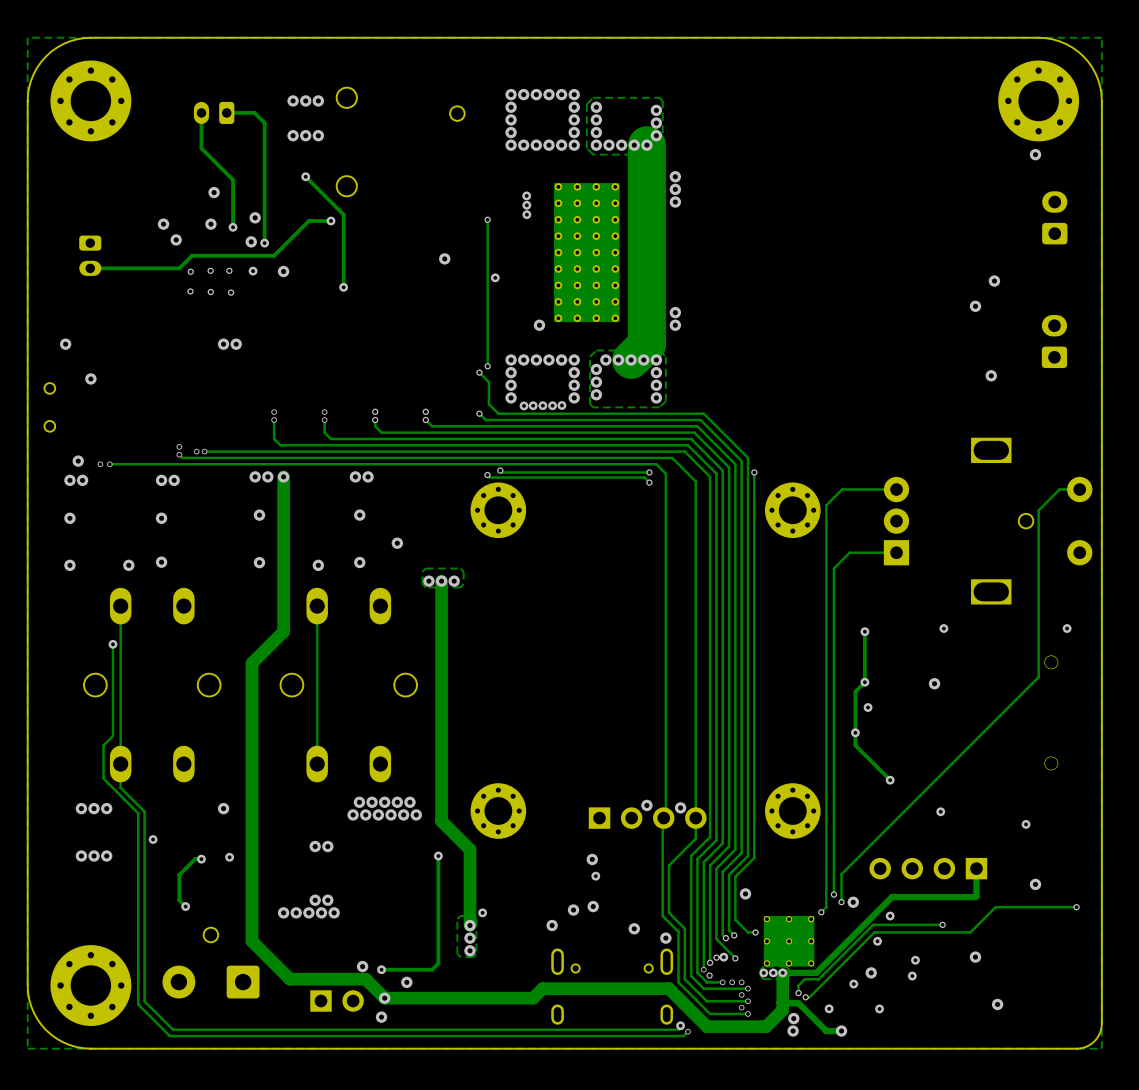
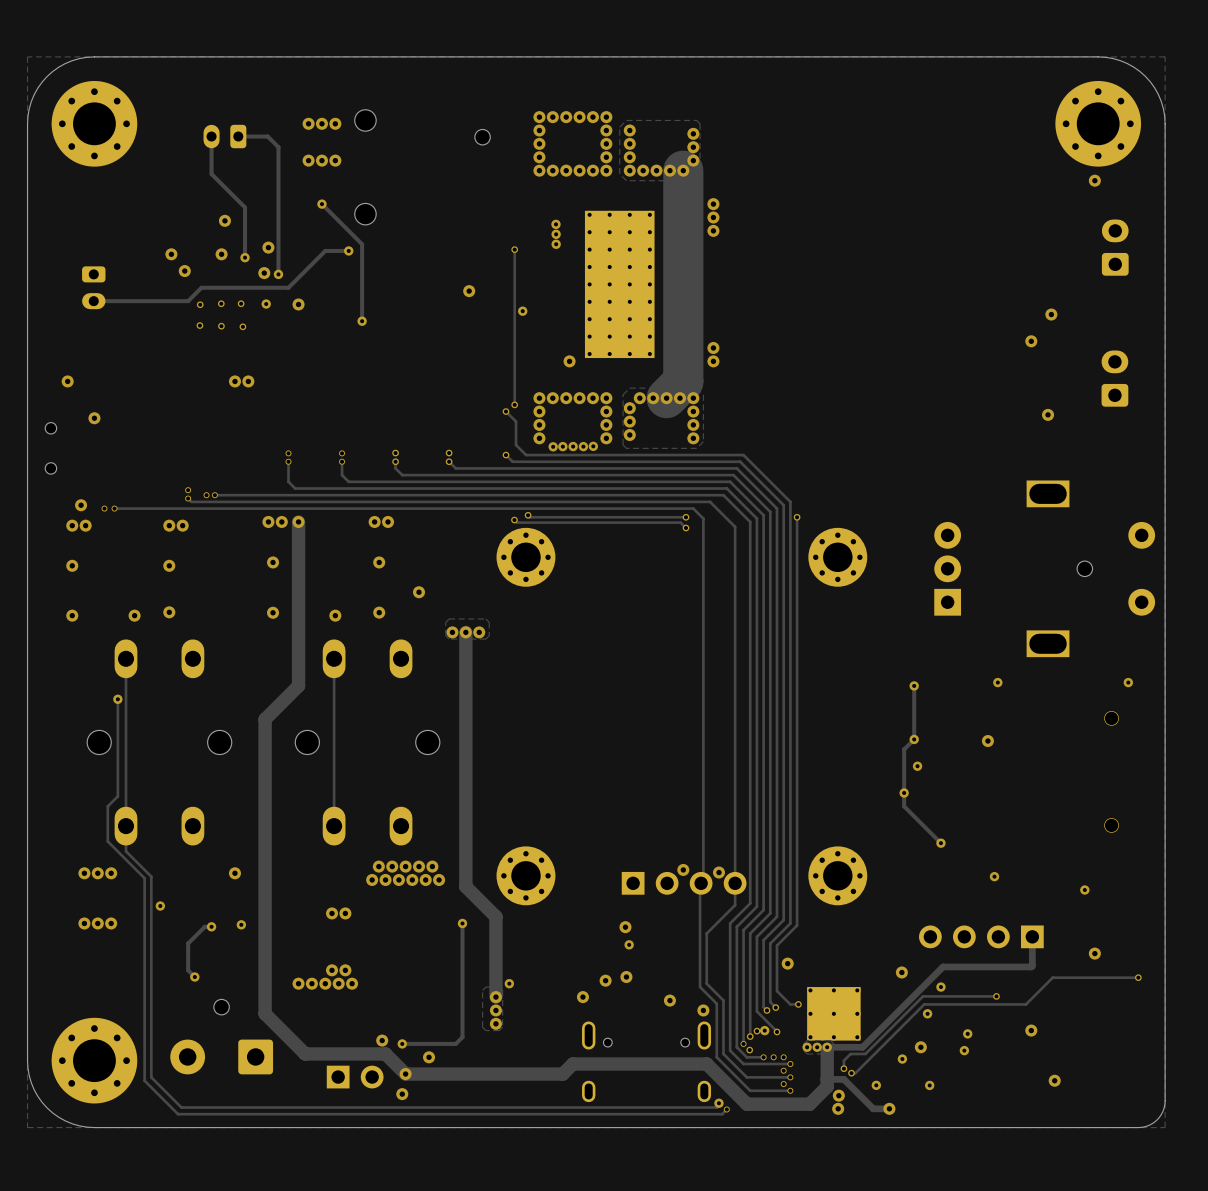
track: (896, 489) (842, 489) (826, 505) (826, 907) (821, 912) -> none
track: (1079, 489) (1059, 489) (1038, 510) (1038, 677) (841, 874) (841, 902) -> none
track: (896, 552) (849, 552) (833, 568) (833, 894) -> none
via: (833, 894) -> none
via: (841, 902) -> none
via: (821, 912) -> none

